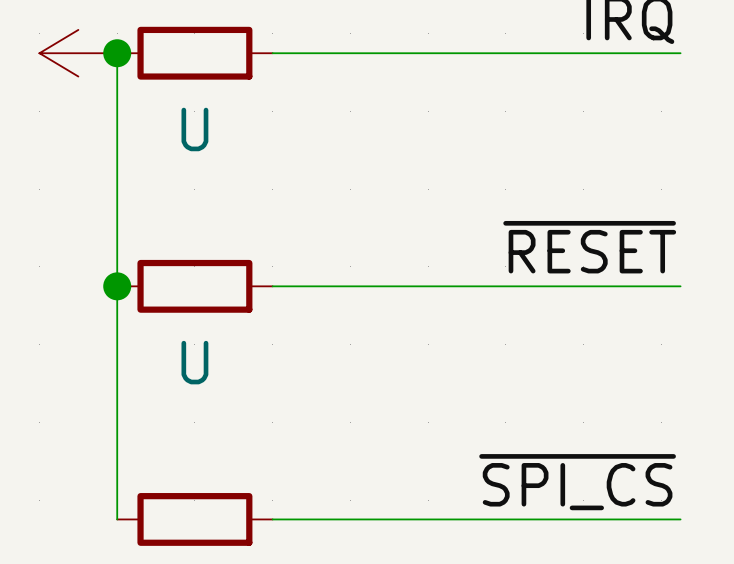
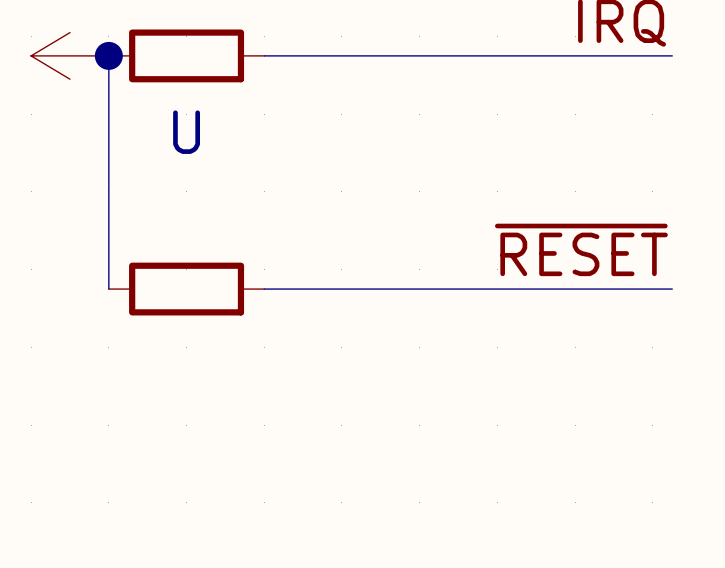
wire: (117, 286) (117, 519) -> none
junction: (117, 286) -> none
label: ~{SPI_CS} (577, 482) -> none
U: (194, 519) -> none
wire: (272, 519) (680, 519) -> none

